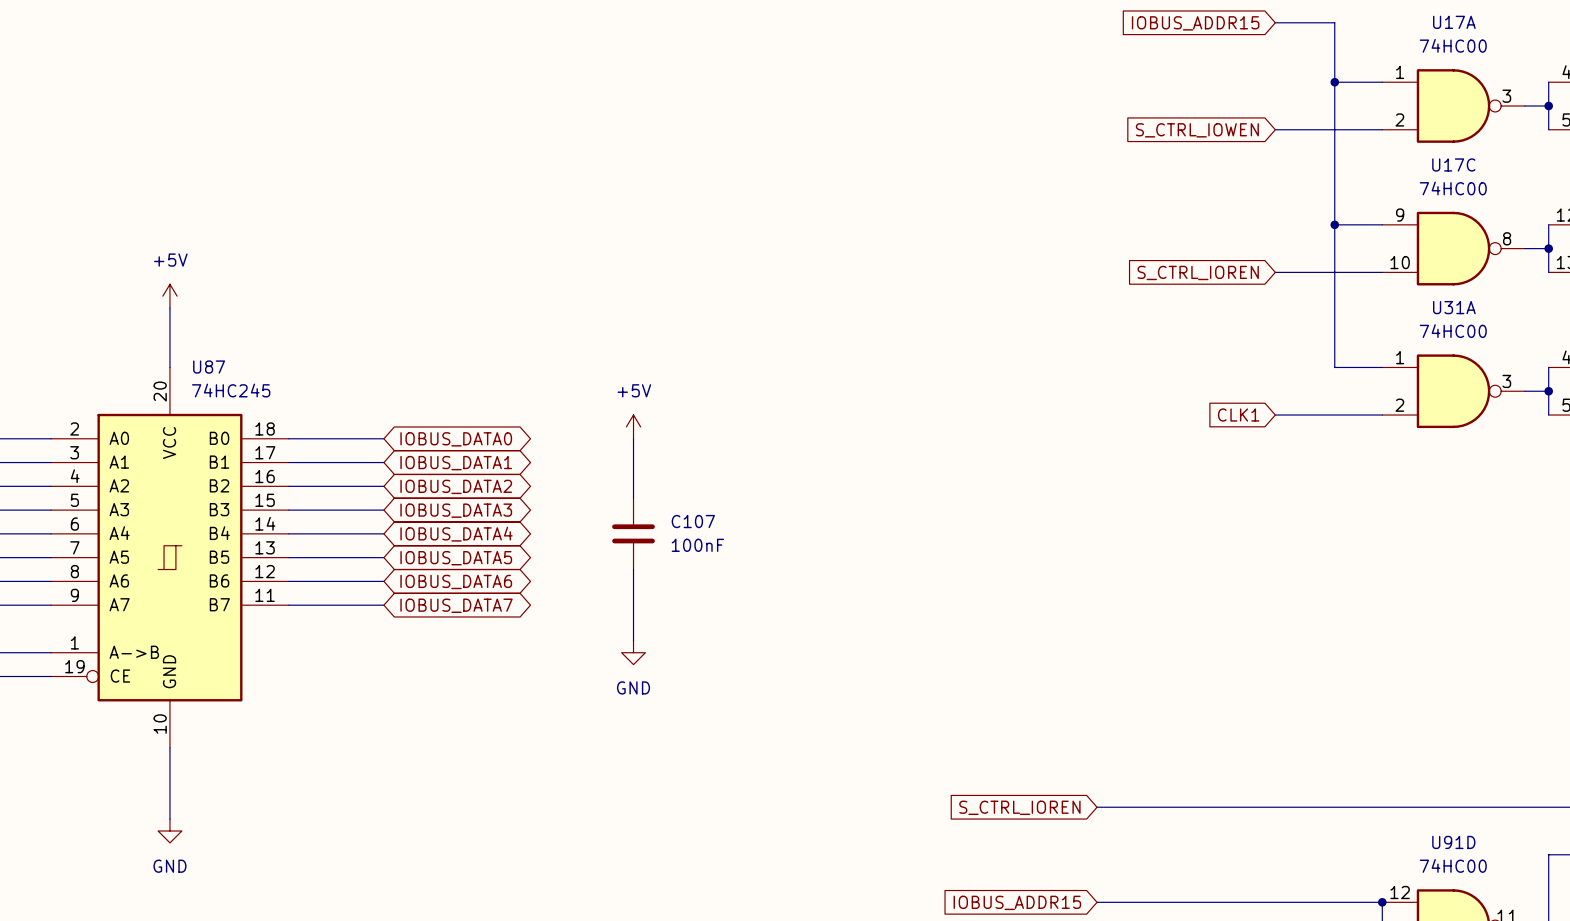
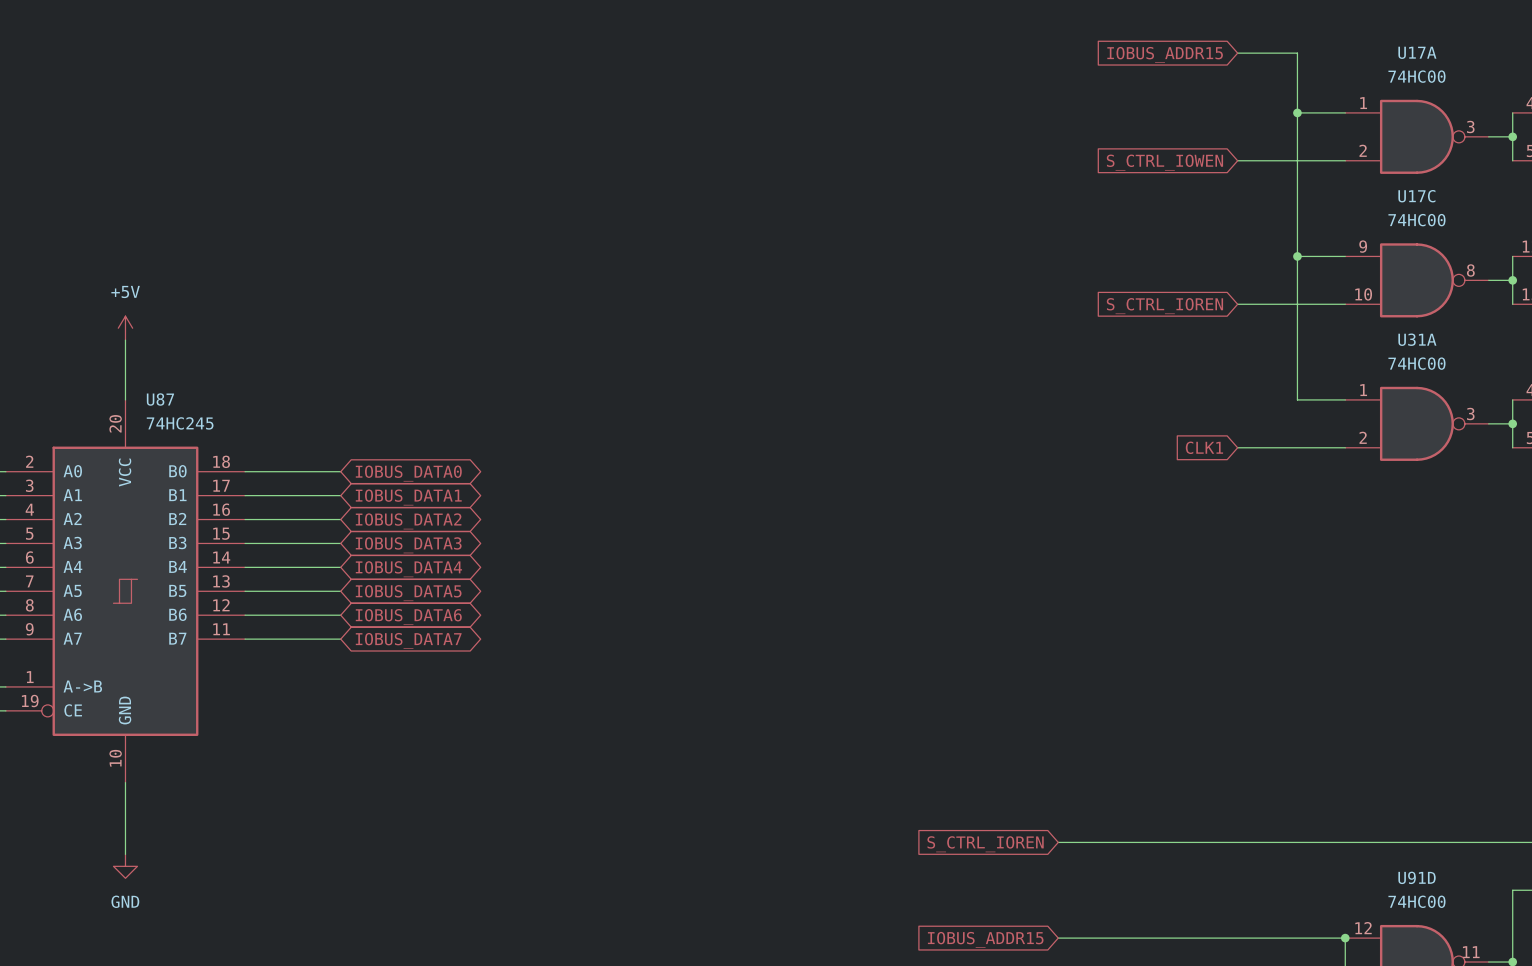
power symbol: +5V (633, 426) -> none
wire: (633, 438) (633, 498) -> none
C107: 100nF (633, 533) -> none
wire: (633, 569) (633, 640) -> none
power symbol: GND (633, 652) -> none

